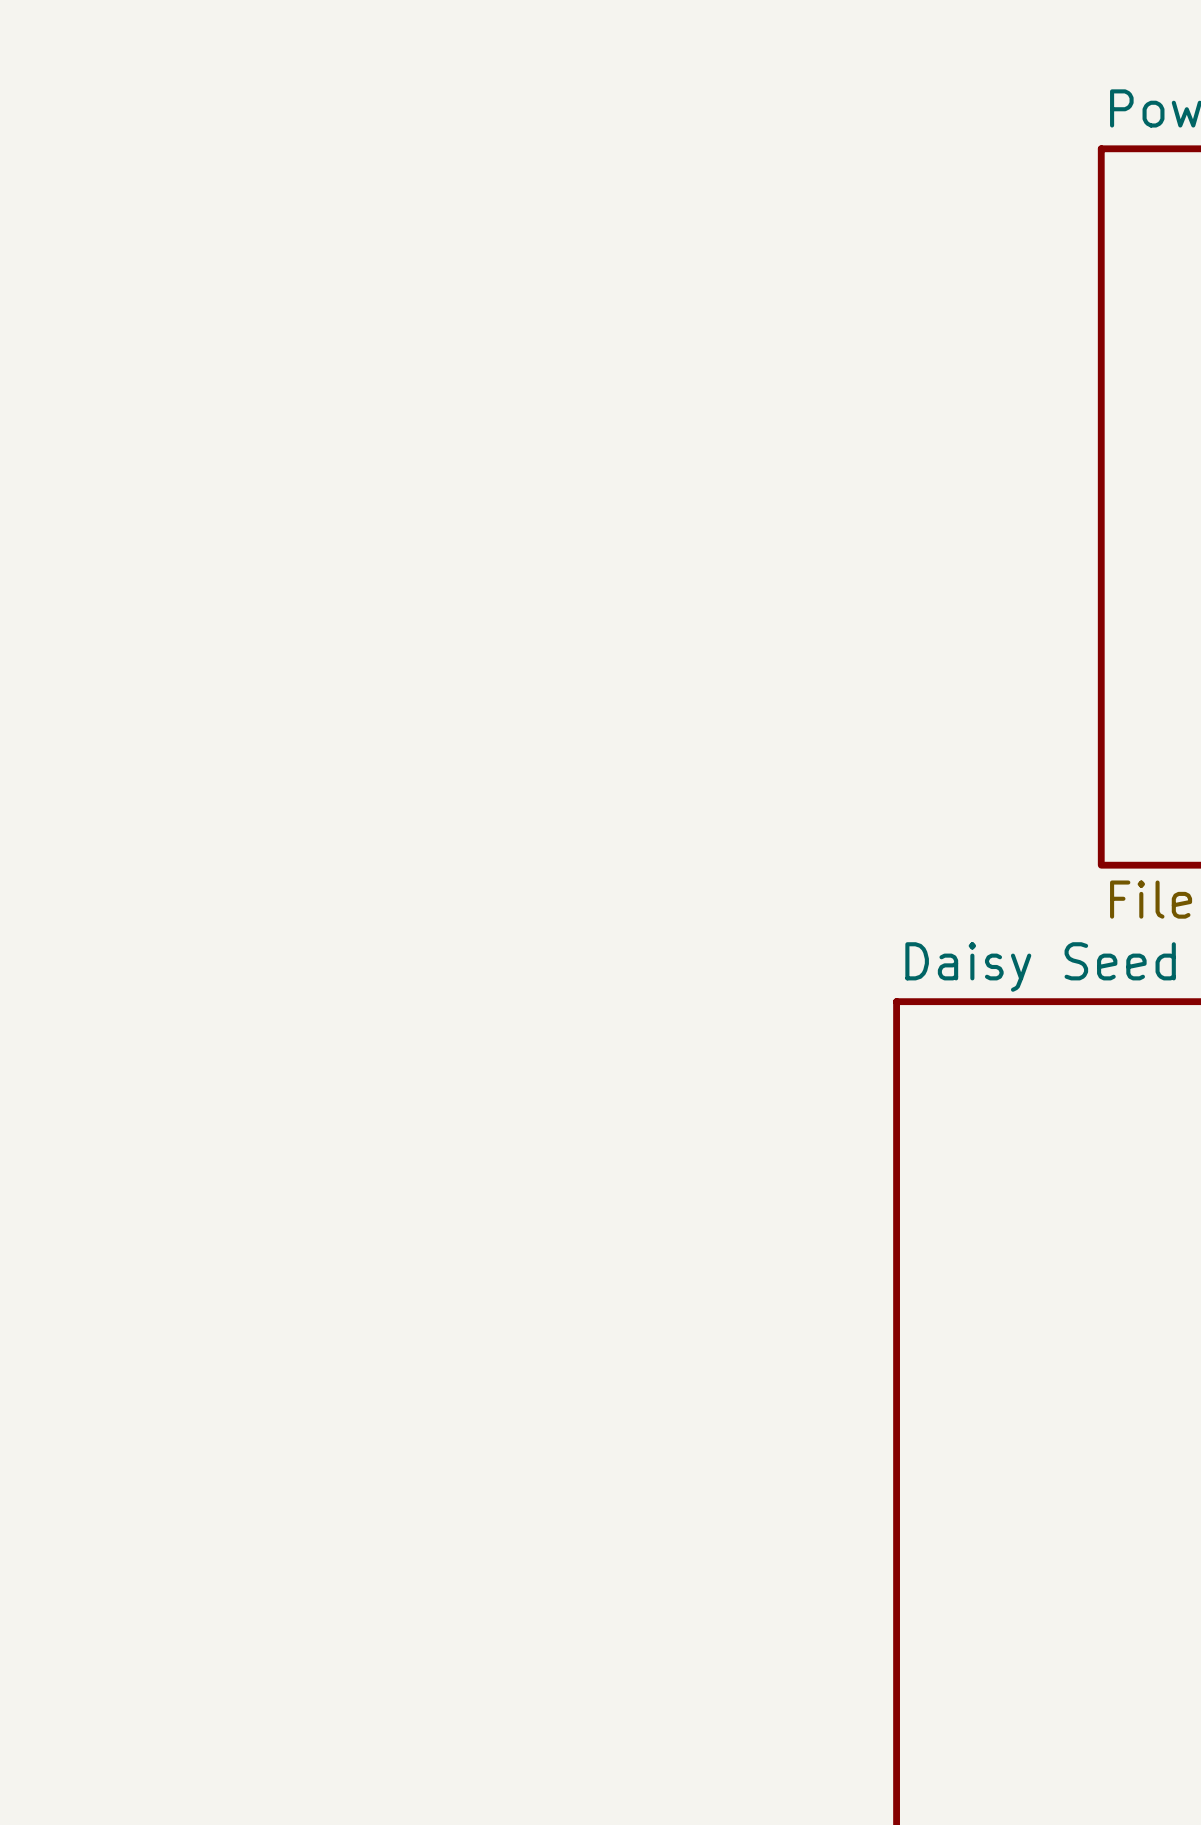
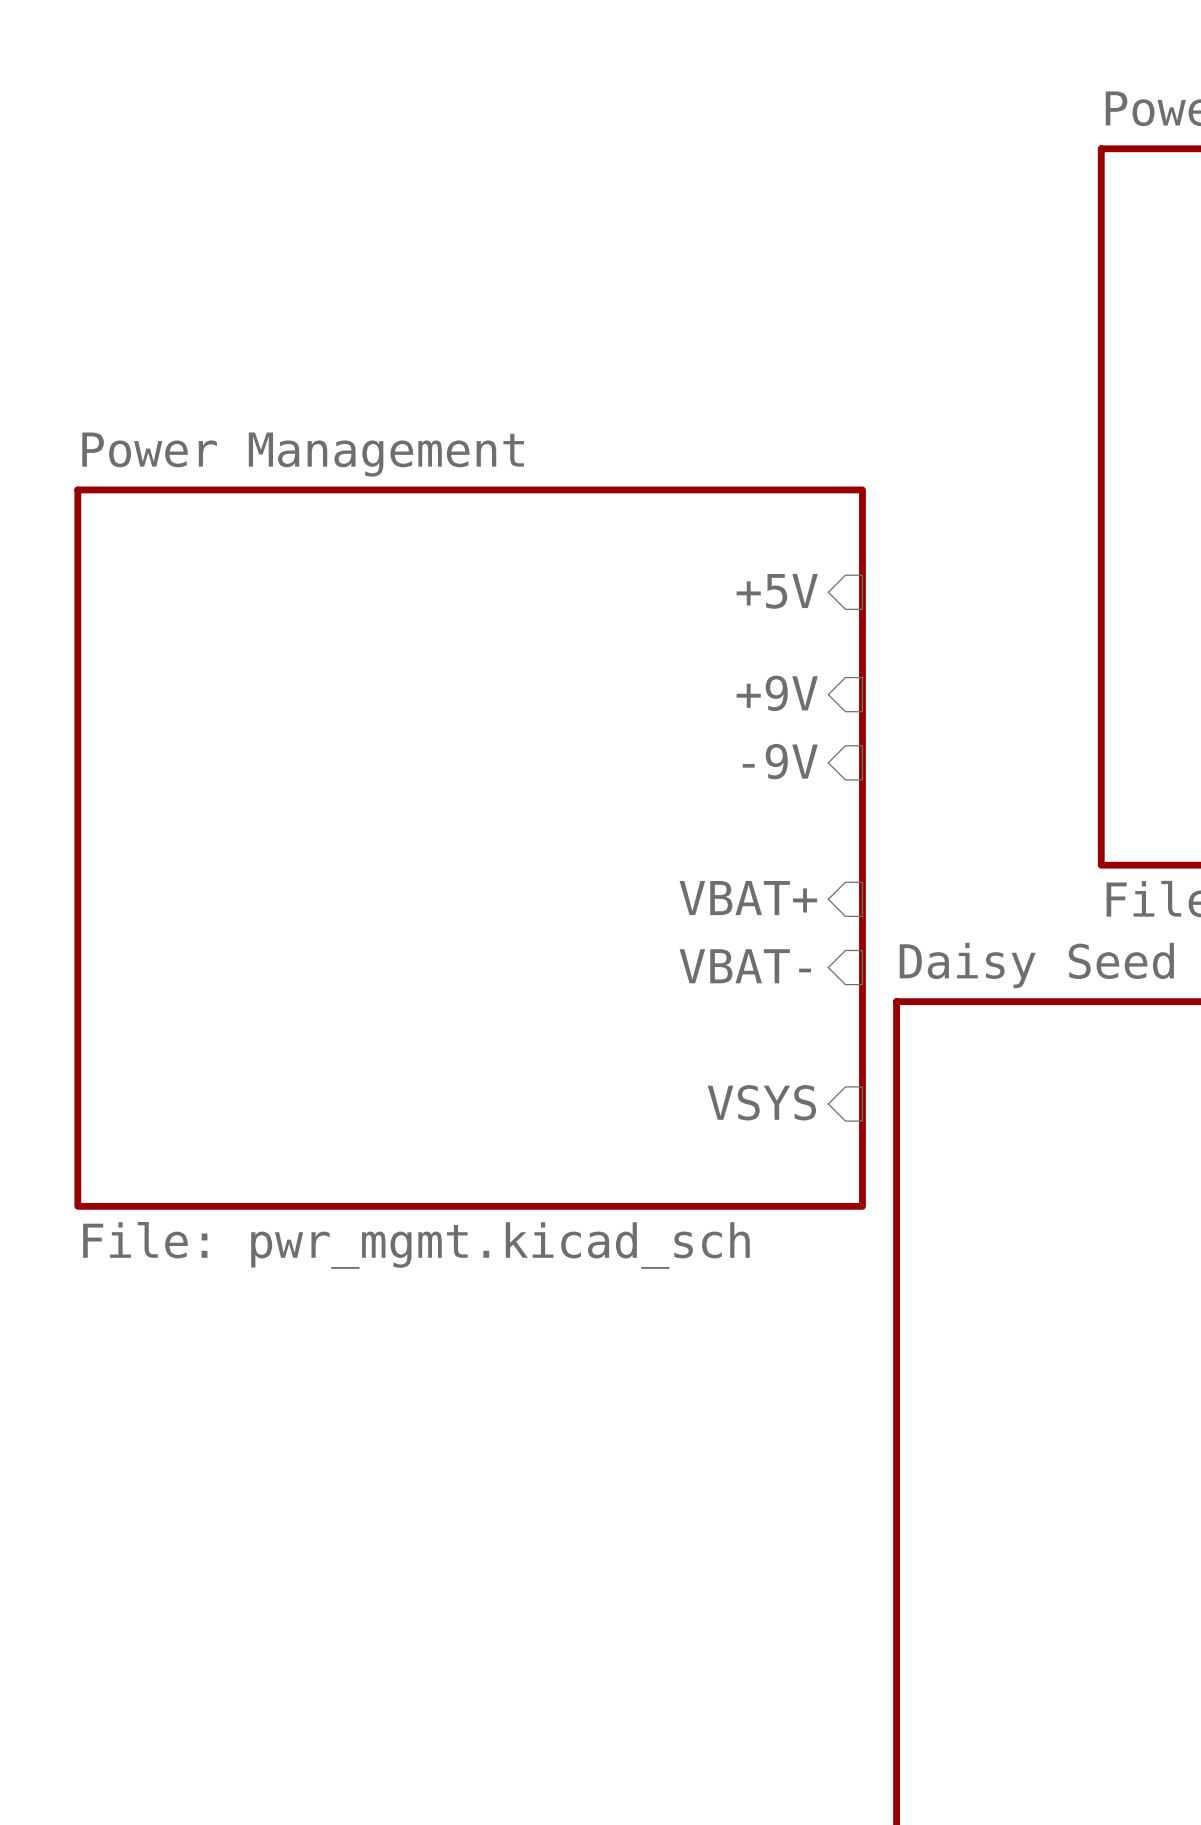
sheet pin: none -> +5V (777, 591)
sheet pin: none -> +9V (777, 693)
sheet pin: none -> -9V (780, 761)
sheet Power Management: none -> File: pwr_mgmt.kicad_sch (470, 848)
sheet pin: none -> VBAT+ (748, 898)
sheet pin: none -> VBAT- (745, 966)
sheet pin: none -> VSYS (761, 1102)

